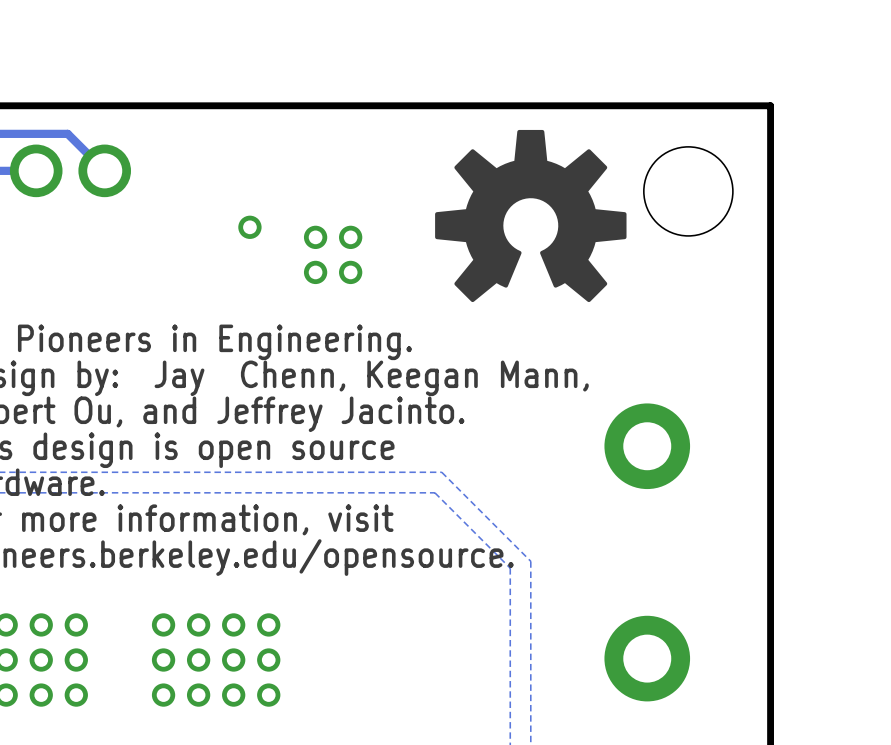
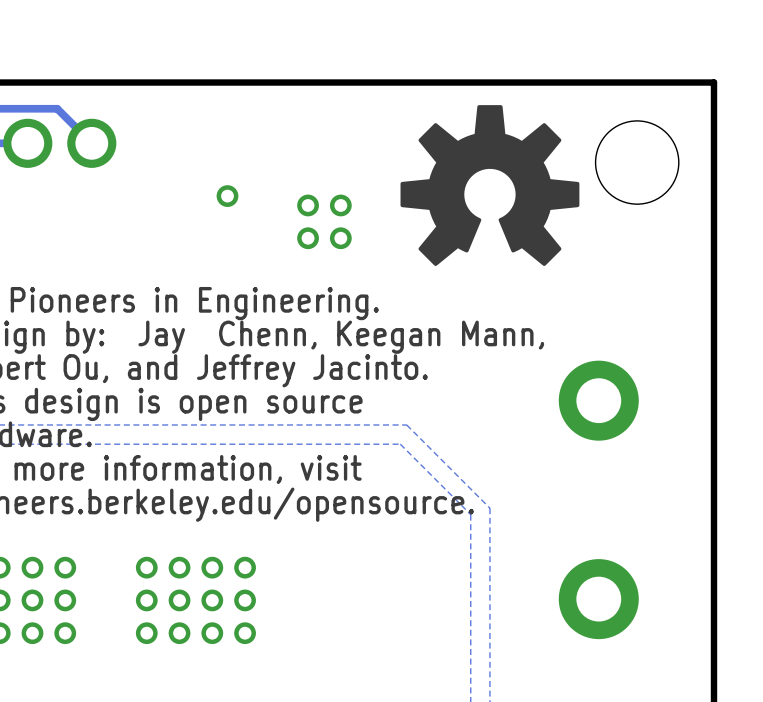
via: (315, 237) -> none
via: none -> (308, 205)
via: (350, 237) -> none
via: none -> (340, 205)
via: (315, 272) -> none
via: none -> (308, 238)
via: (350, 272) -> none
via: none -> (340, 238)

